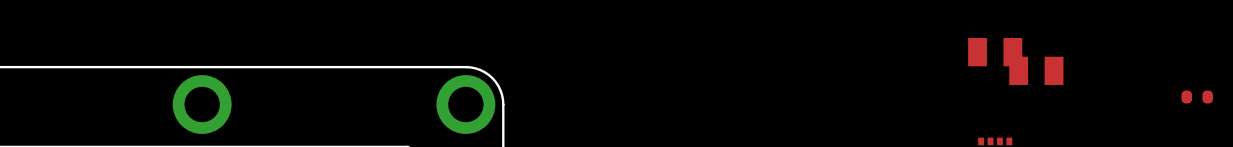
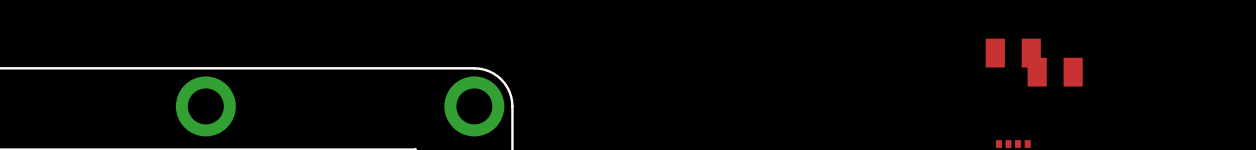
part: (1197, 97) -> none

